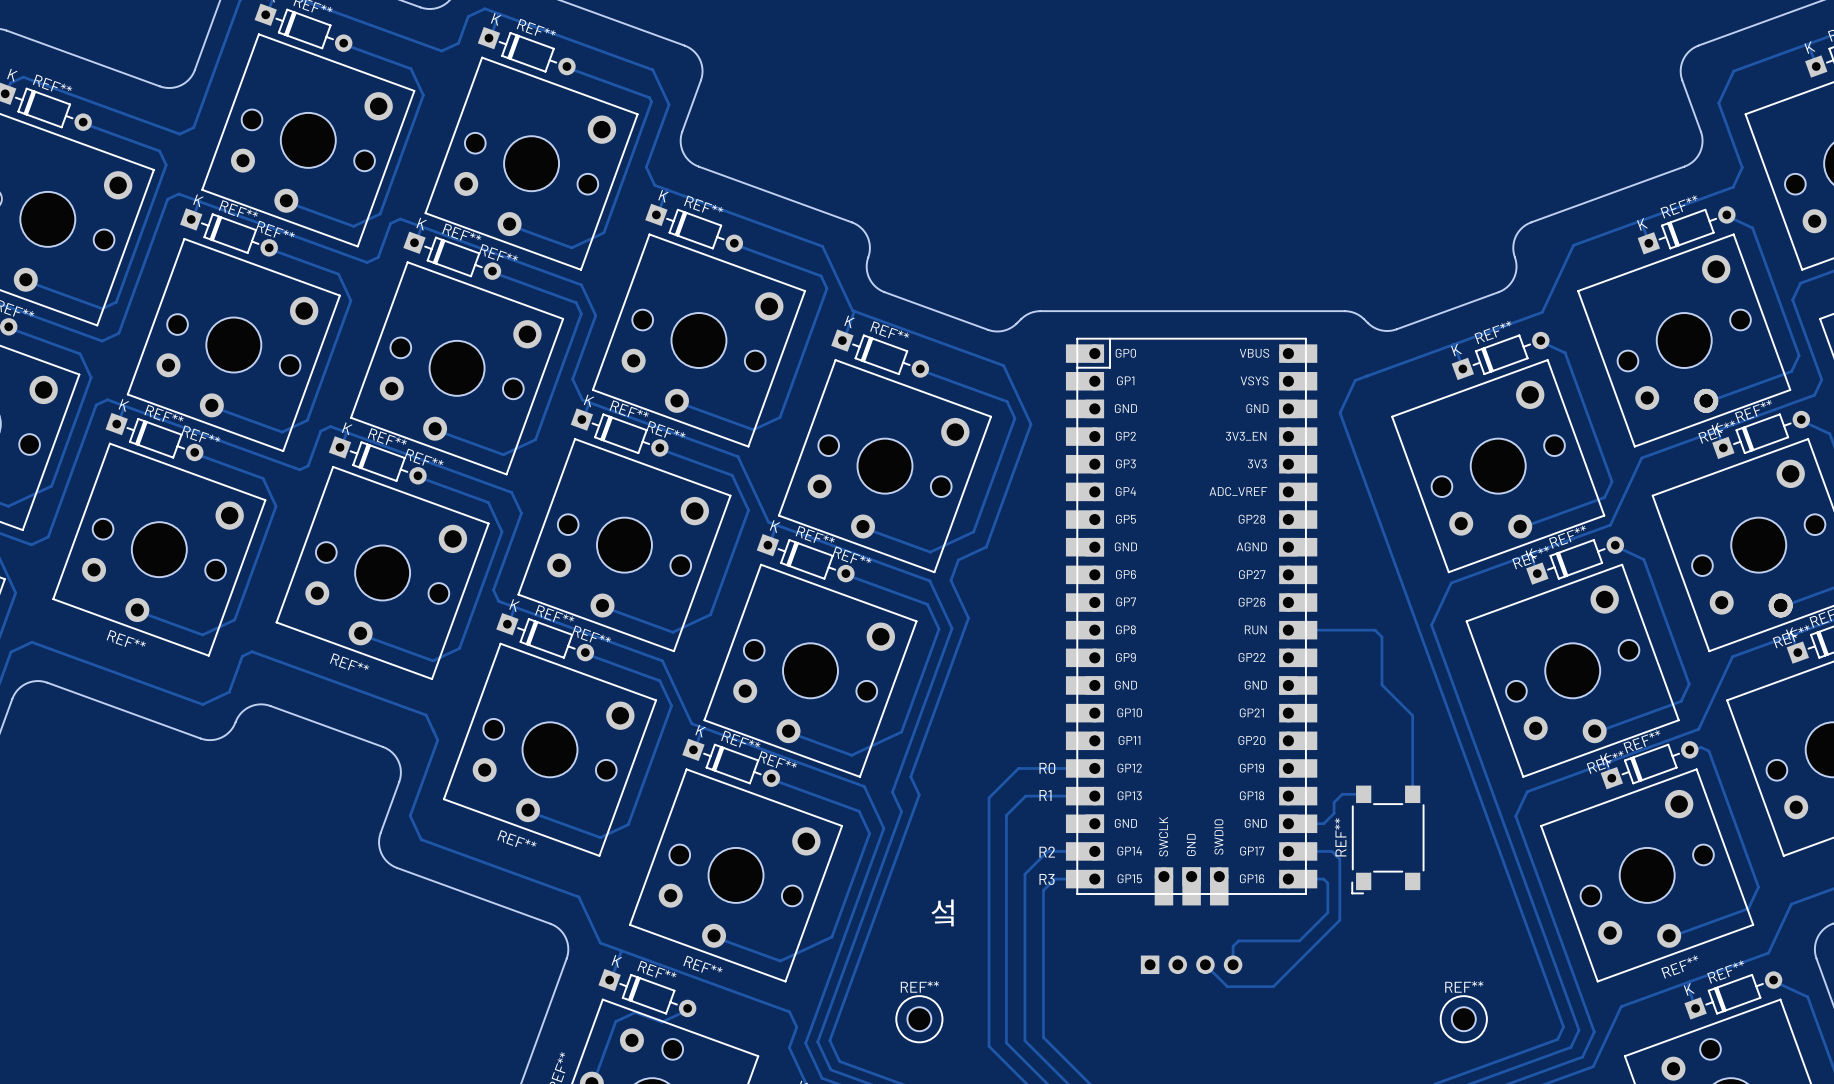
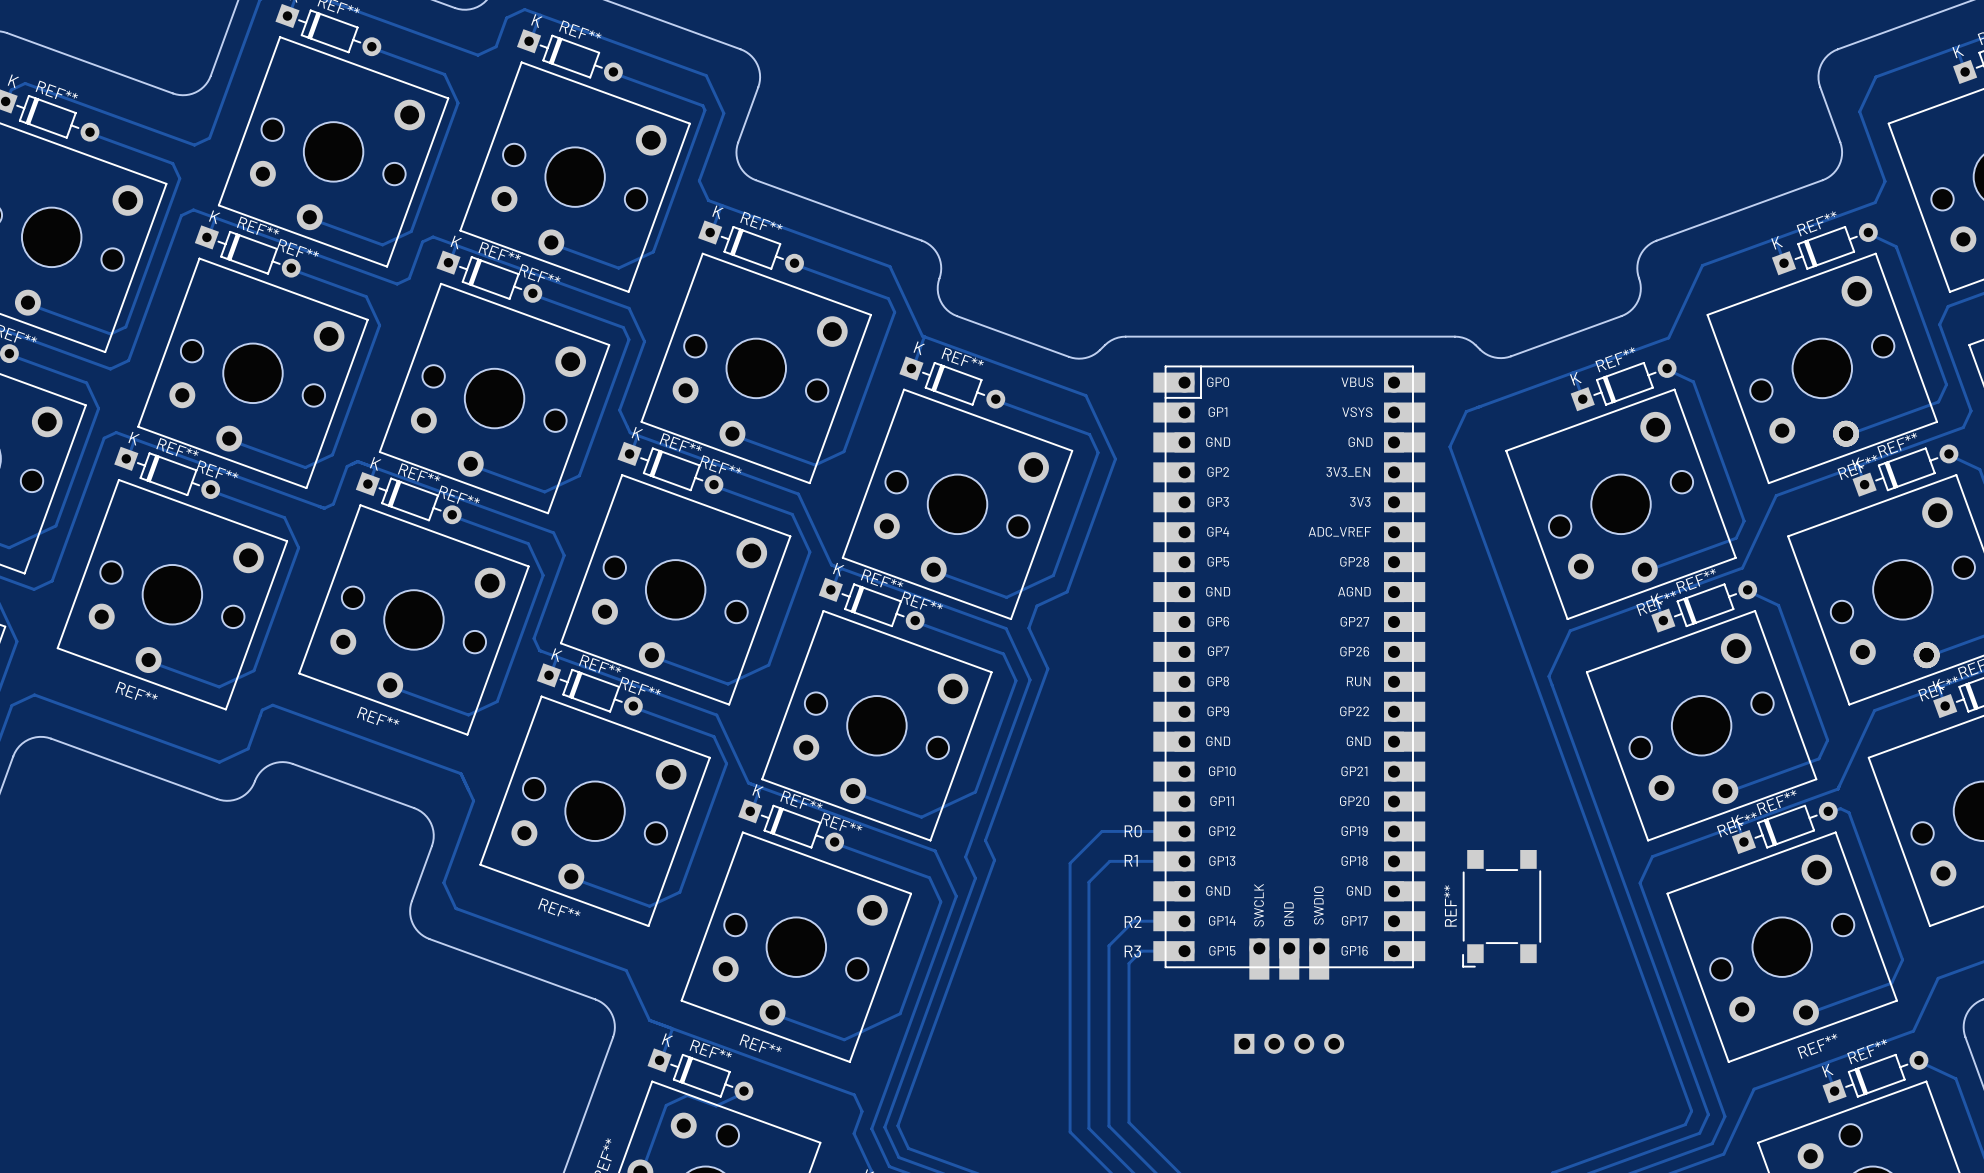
track: (1288, 630) (1375, 630) (1381, 637) (1381, 684) (1412, 715) (1412, 794) -> none
track: (1363, 794) (1342, 794) (1334, 802) (1334, 813) (1323, 823) (1288, 823) -> none
track: (1288, 851) (1331, 851) (1339, 859) (1339, 920) (1273, 986) (1227, 986) (1205, 964) -> none
track: (1288, 879) (1323, 879) (1327, 883) (1327, 912) (1299, 940) (1238, 940) (1233, 946) (1233, 964) -> none
text: 섴 (942, 912) -> none
drawing: [895, 995, 944, 1044] -> none
drawing: [1439, 995, 1488, 1044] -> none
REF**: (919, 1019) -> none
REF**: (1463, 1019) -> none

